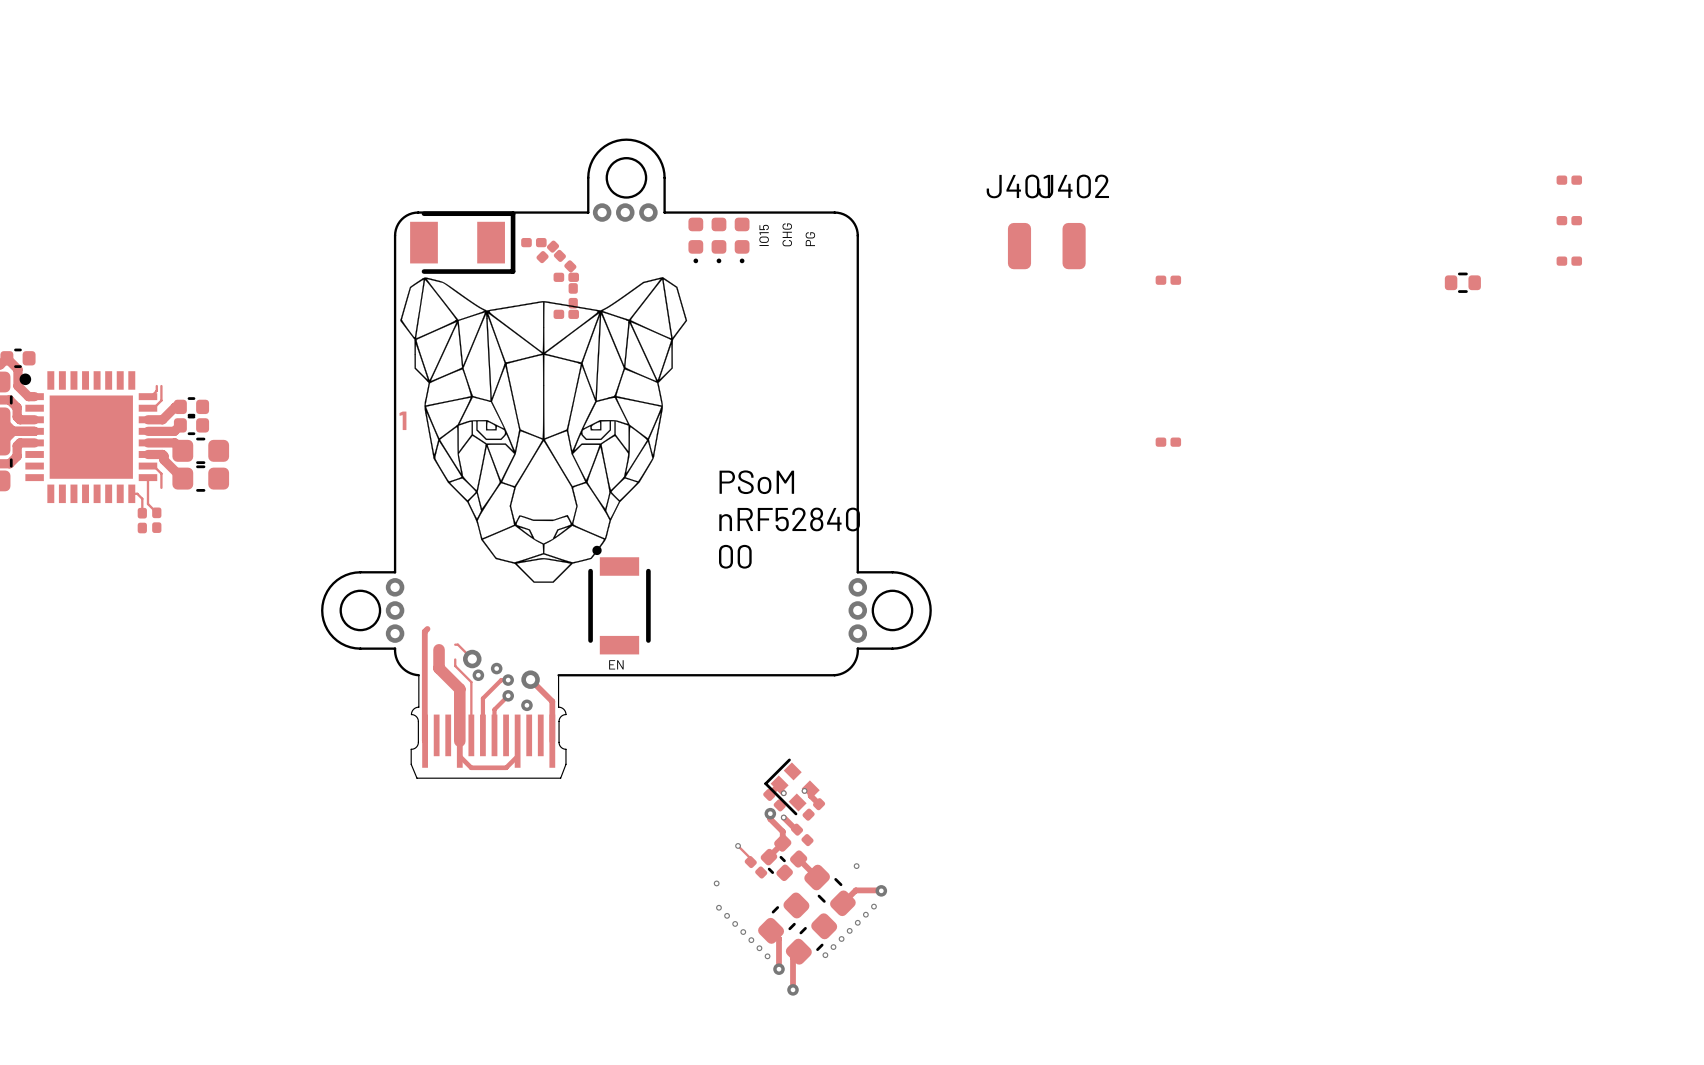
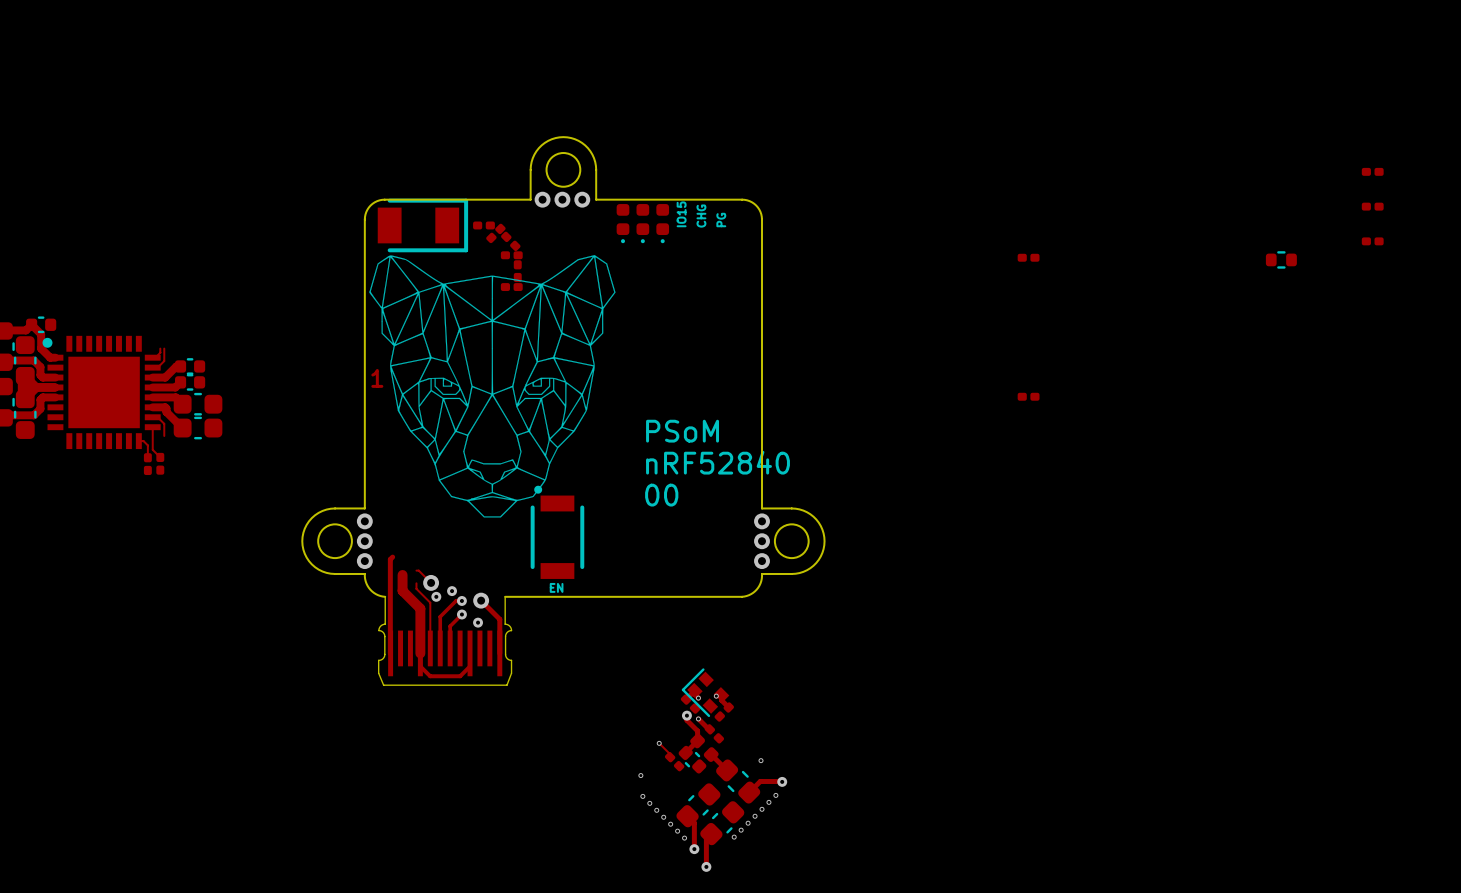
J401: (1019, 246) -> none
J402: (1074, 246) -> none

